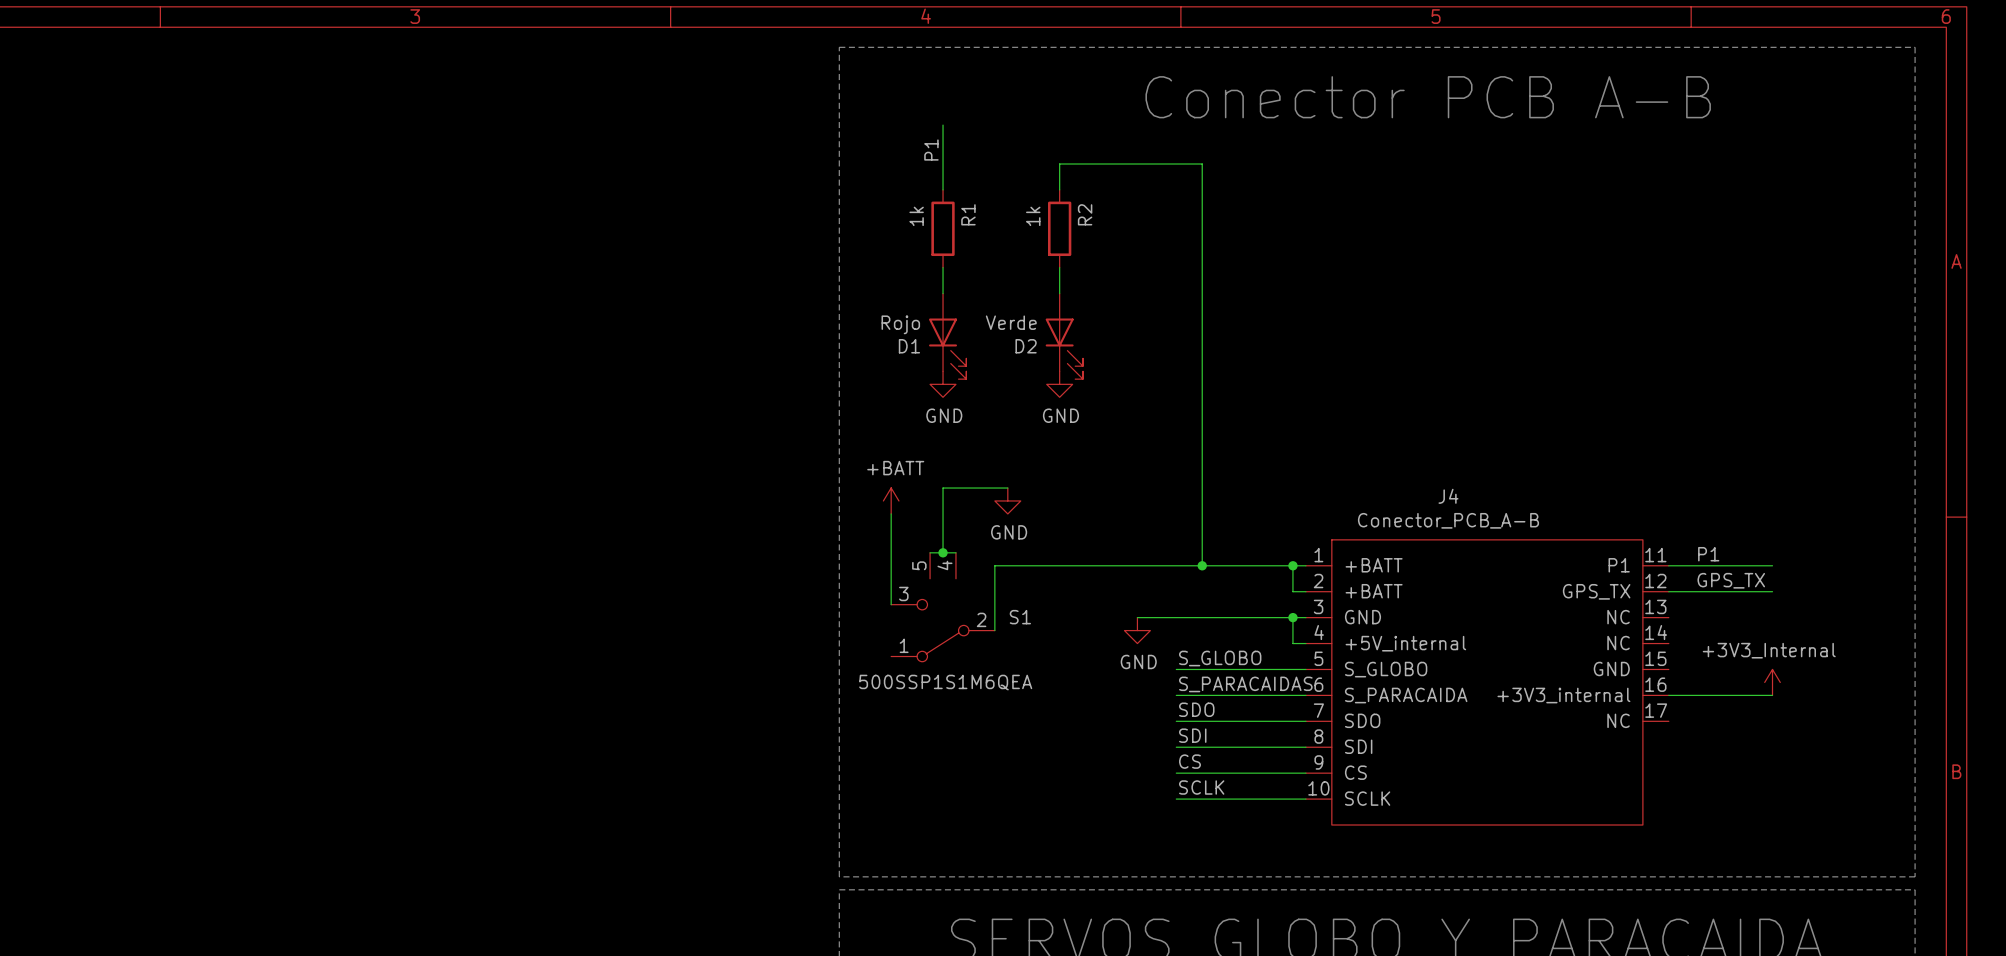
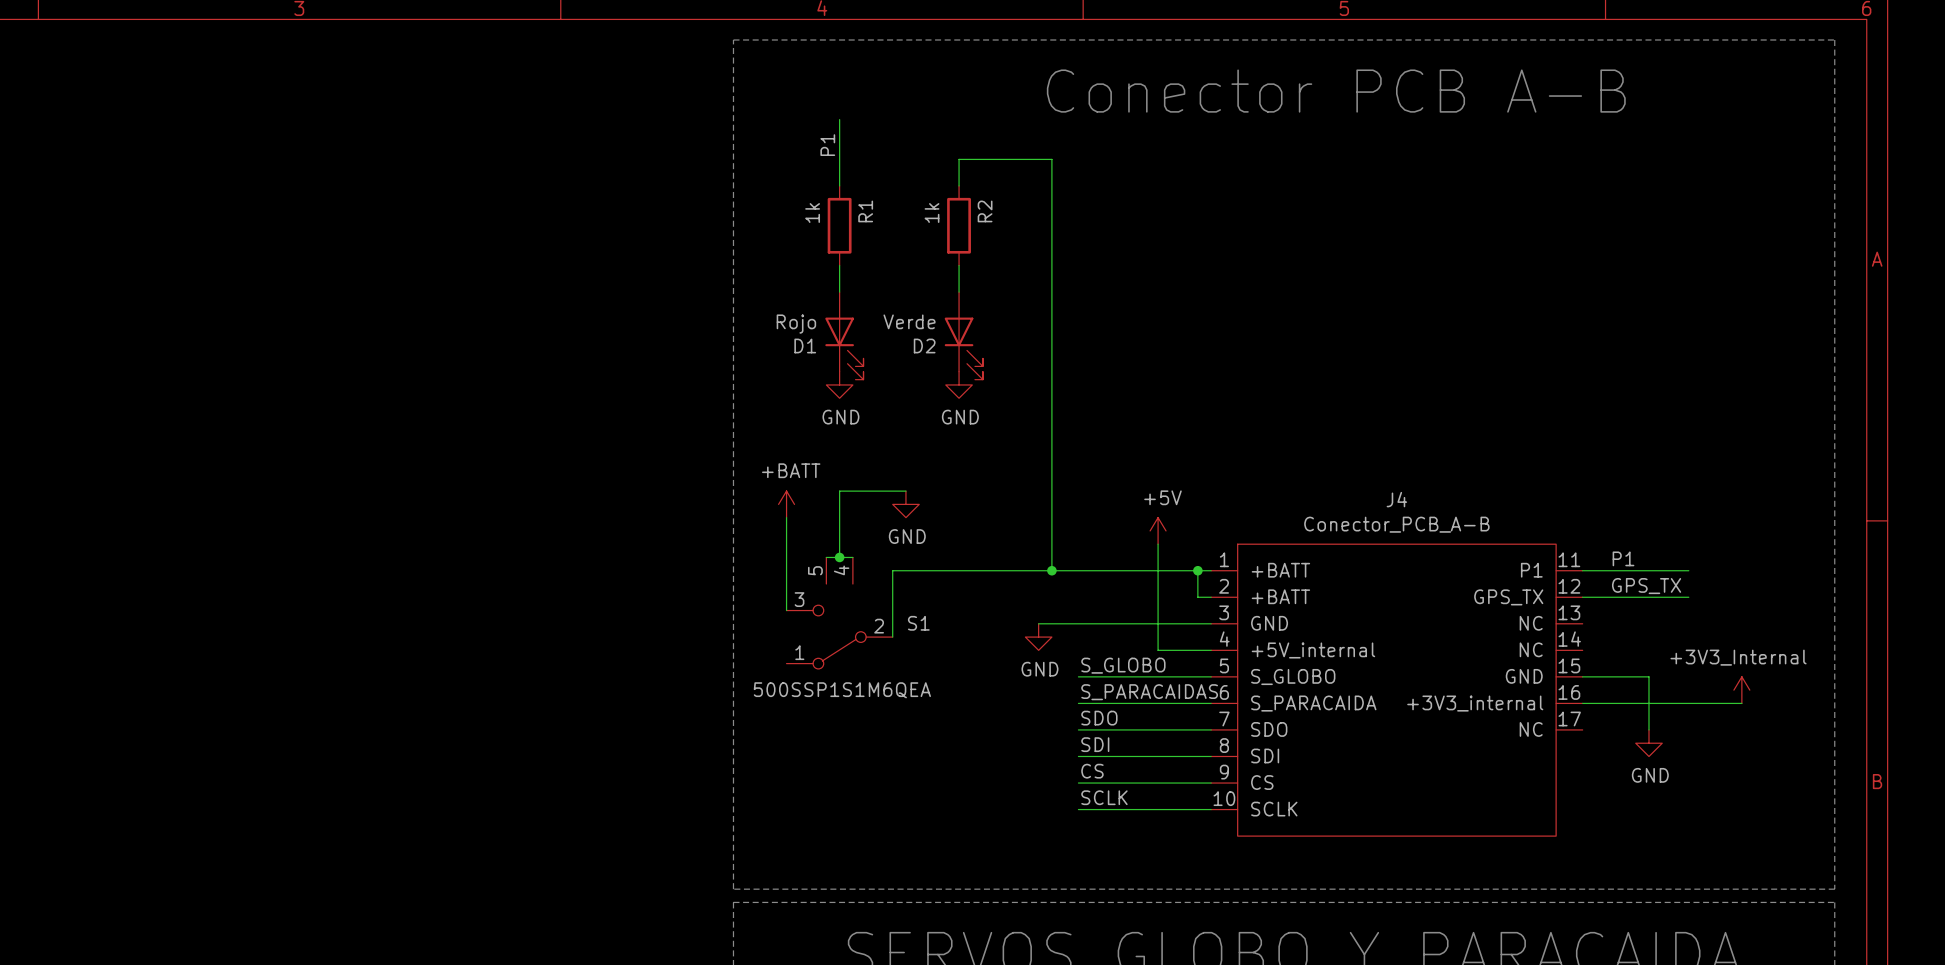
wire: (1150, 164) (1202, 164) (1202, 565) -> (1051, 159) (1051, 570)
J4 name position: J4 (1448, 496) -> J4 (1396, 499)
J4 value position: Conector_PCB_A-B (1448, 520) -> Conector_PCB_A-B (1396, 524)
power symbol: none -> +5V (1158, 530)
junction position: (1202, 565) -> (1051, 570)
wire: (1292, 617) (1292, 643) -> (1158, 544) (1158, 650) (1197, 650)
junction: (1292, 617) -> none
wire: none -> (1582, 676) (1648, 676) (1648, 729)
power symbol position: +3V3_Internal (1772, 682) -> +3V3_Internal (1741, 690)
wire: none -> (1688, 703) (1741, 703)
power symbol: none -> GND (1648, 743)

